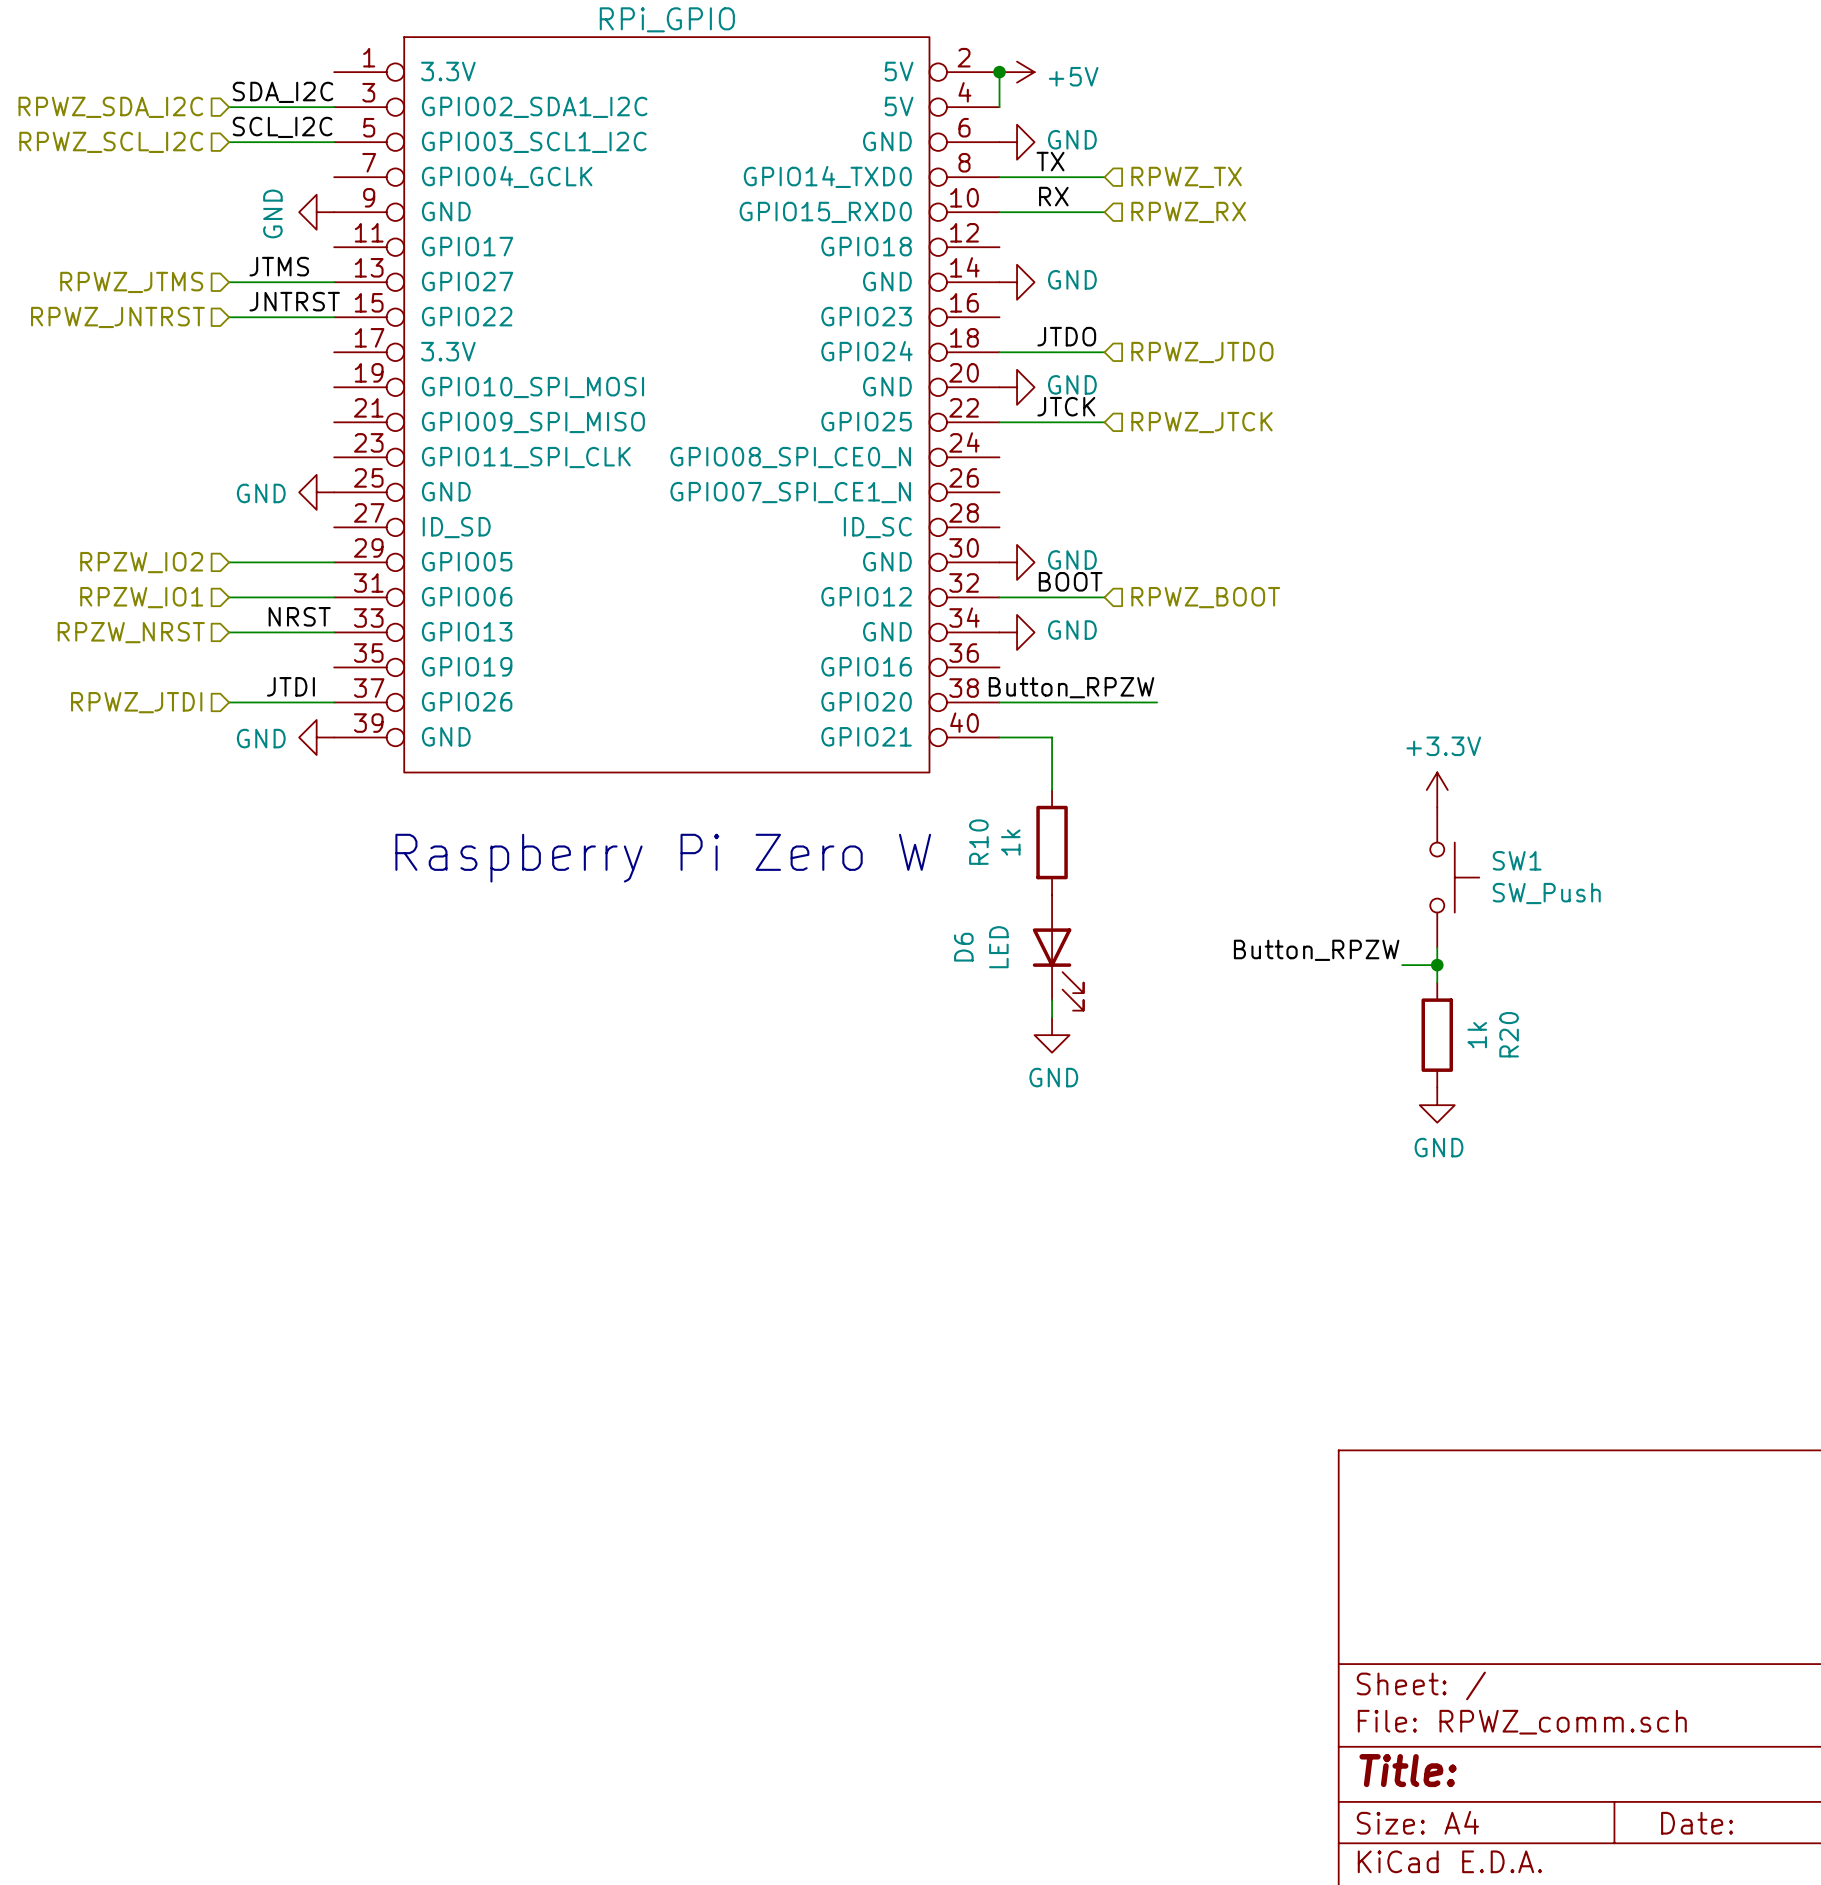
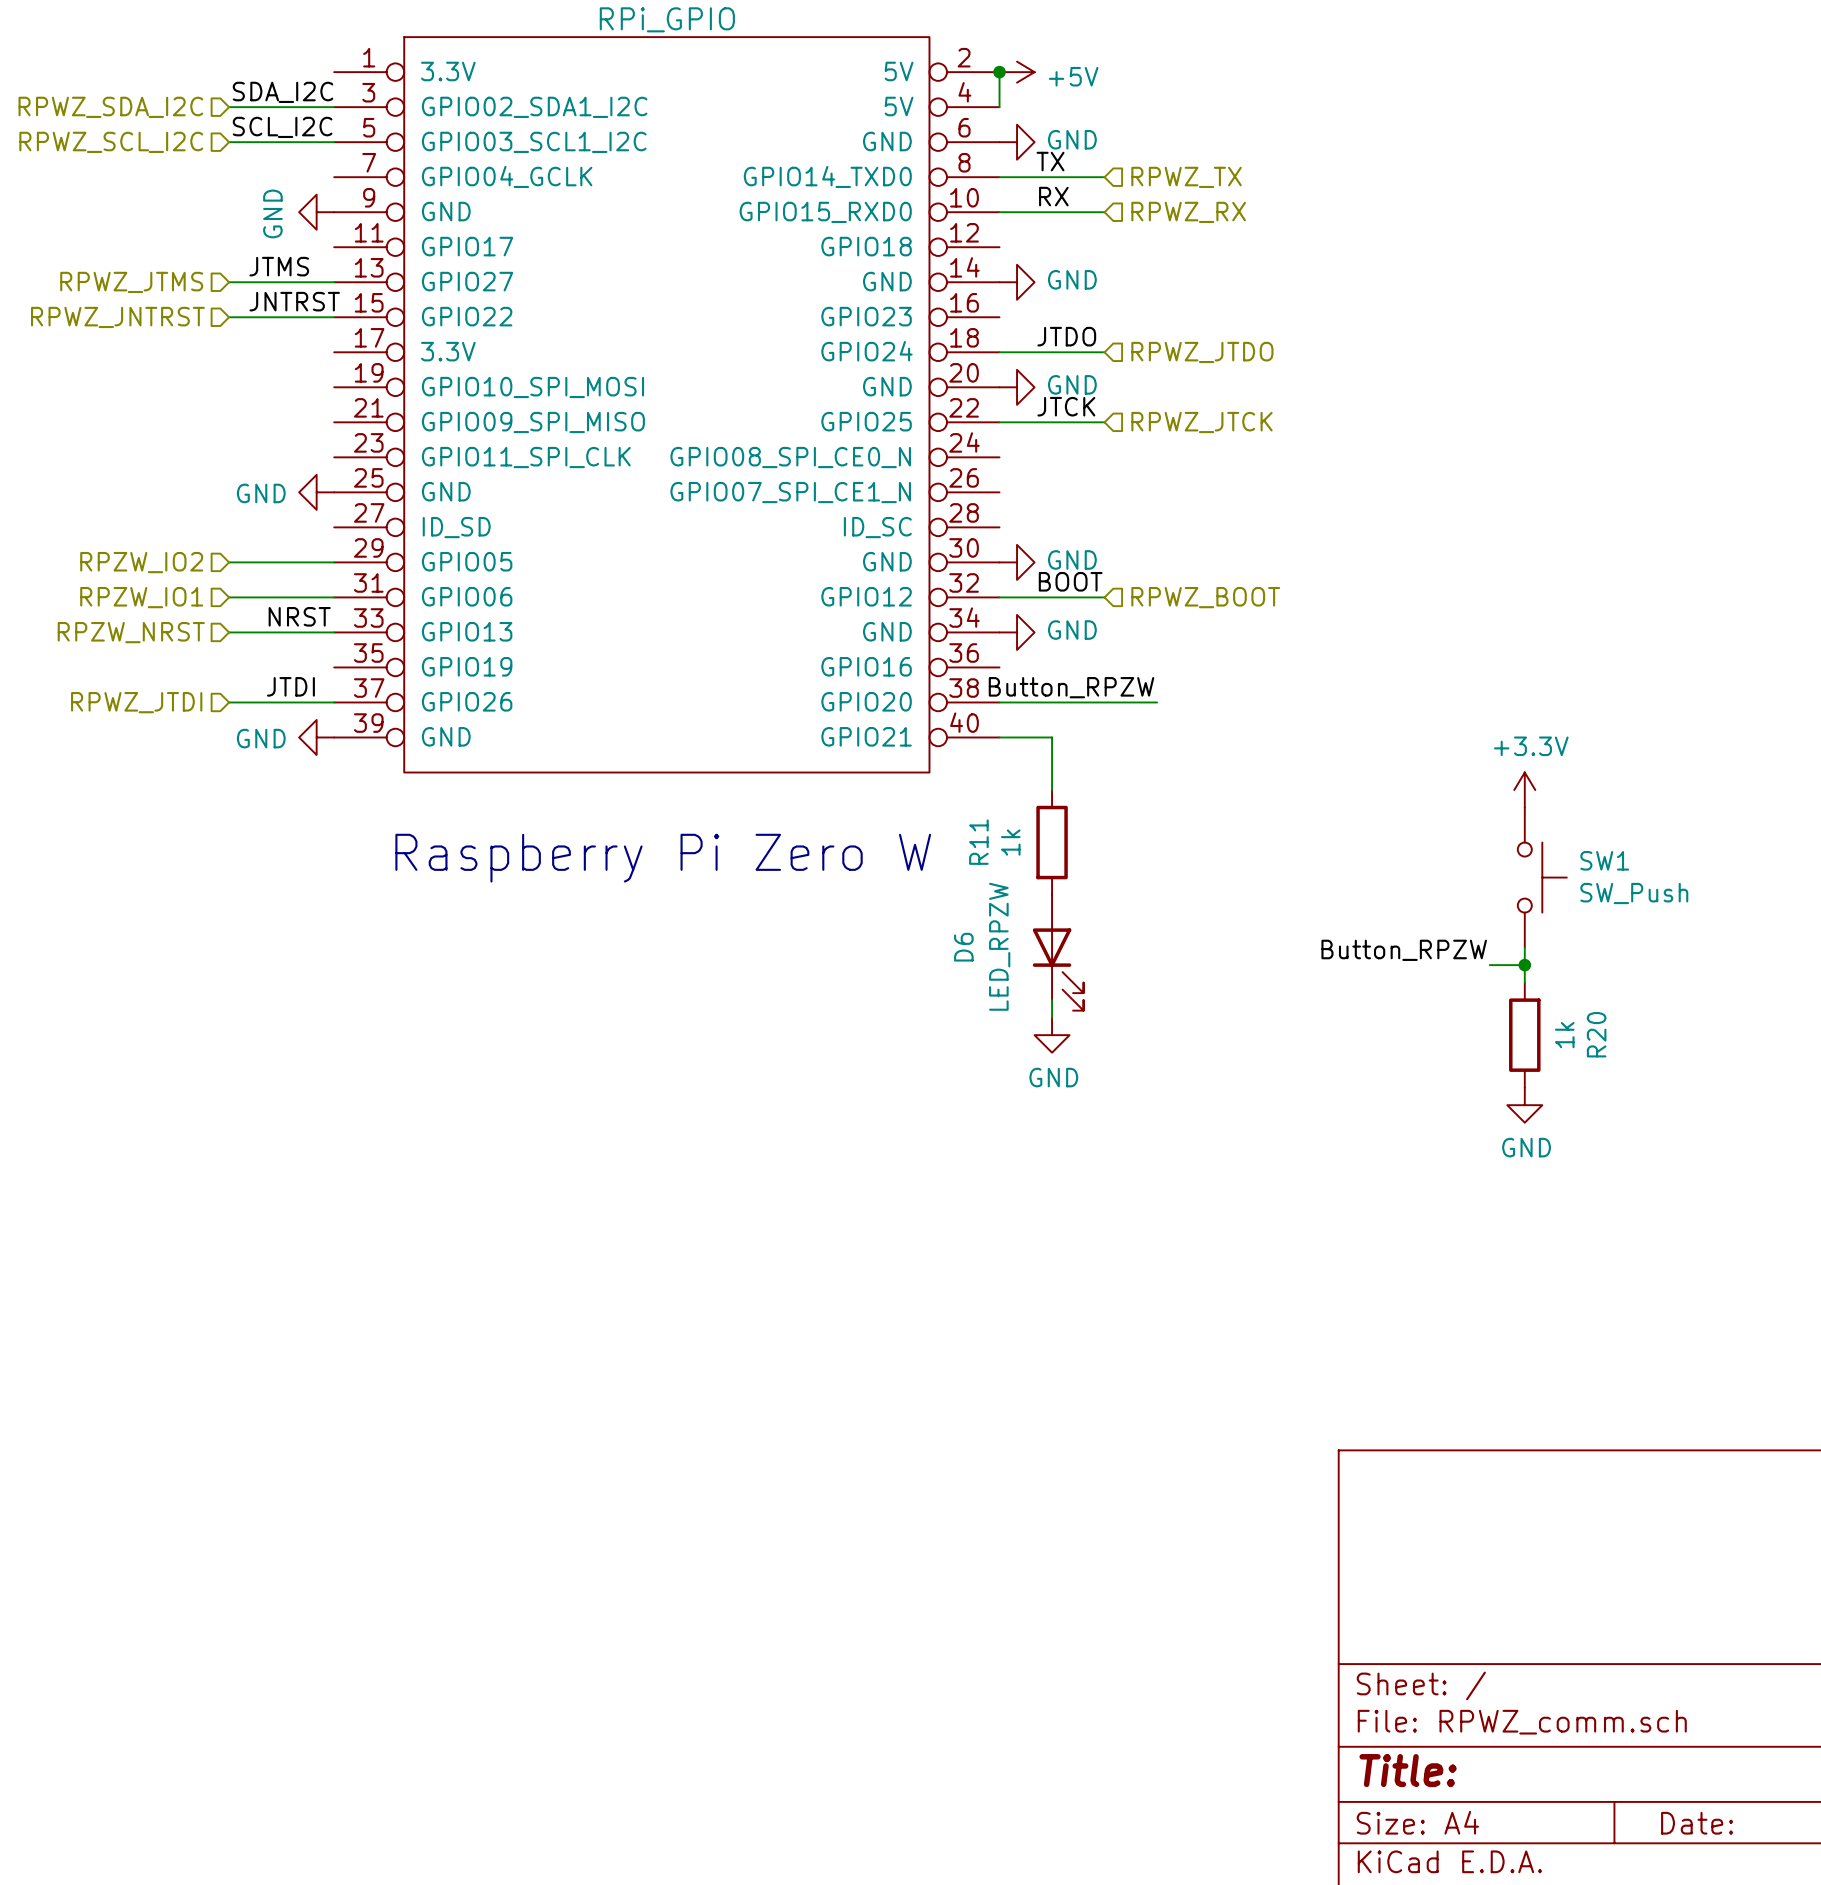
power symbol position: +3.3V (1437, 790) -> +3.3V (1524, 790)
R10 name: R10 (978, 842) -> R11 (978, 842)
SW1 position: (1454, 877) -> (1542, 877)
D6 value: LED (998, 947) -> LED_RPZW (999, 946)
wire: (1437, 947) (1437, 982) -> (1524, 947) (1524, 982)
label position: Button_RPZW (1316, 950) -> Button_RPZW (1404, 950)
wire: (1402, 965) (1437, 965) -> (1489, 965) (1524, 965)
junction: (1437, 965) -> none
junction: none -> (1524, 965)
R20 position: (1437, 1035) -> (1524, 1035)
power symbol position: GND (1437, 1105) -> GND (1524, 1105)

